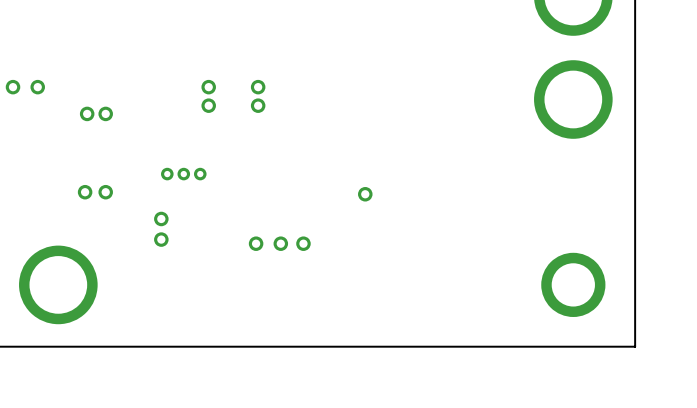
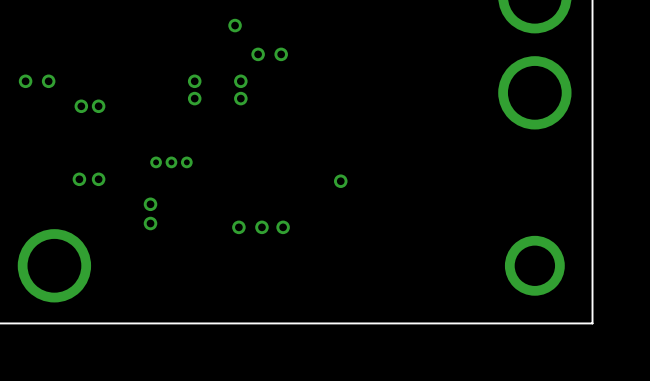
via: none -> (235, 25)
via: none -> (258, 54)
via: none -> (281, 54)
via: (13, 87) -> none
via: none -> (25, 81)
via: (37, 87) -> none
via: none -> (48, 81)

